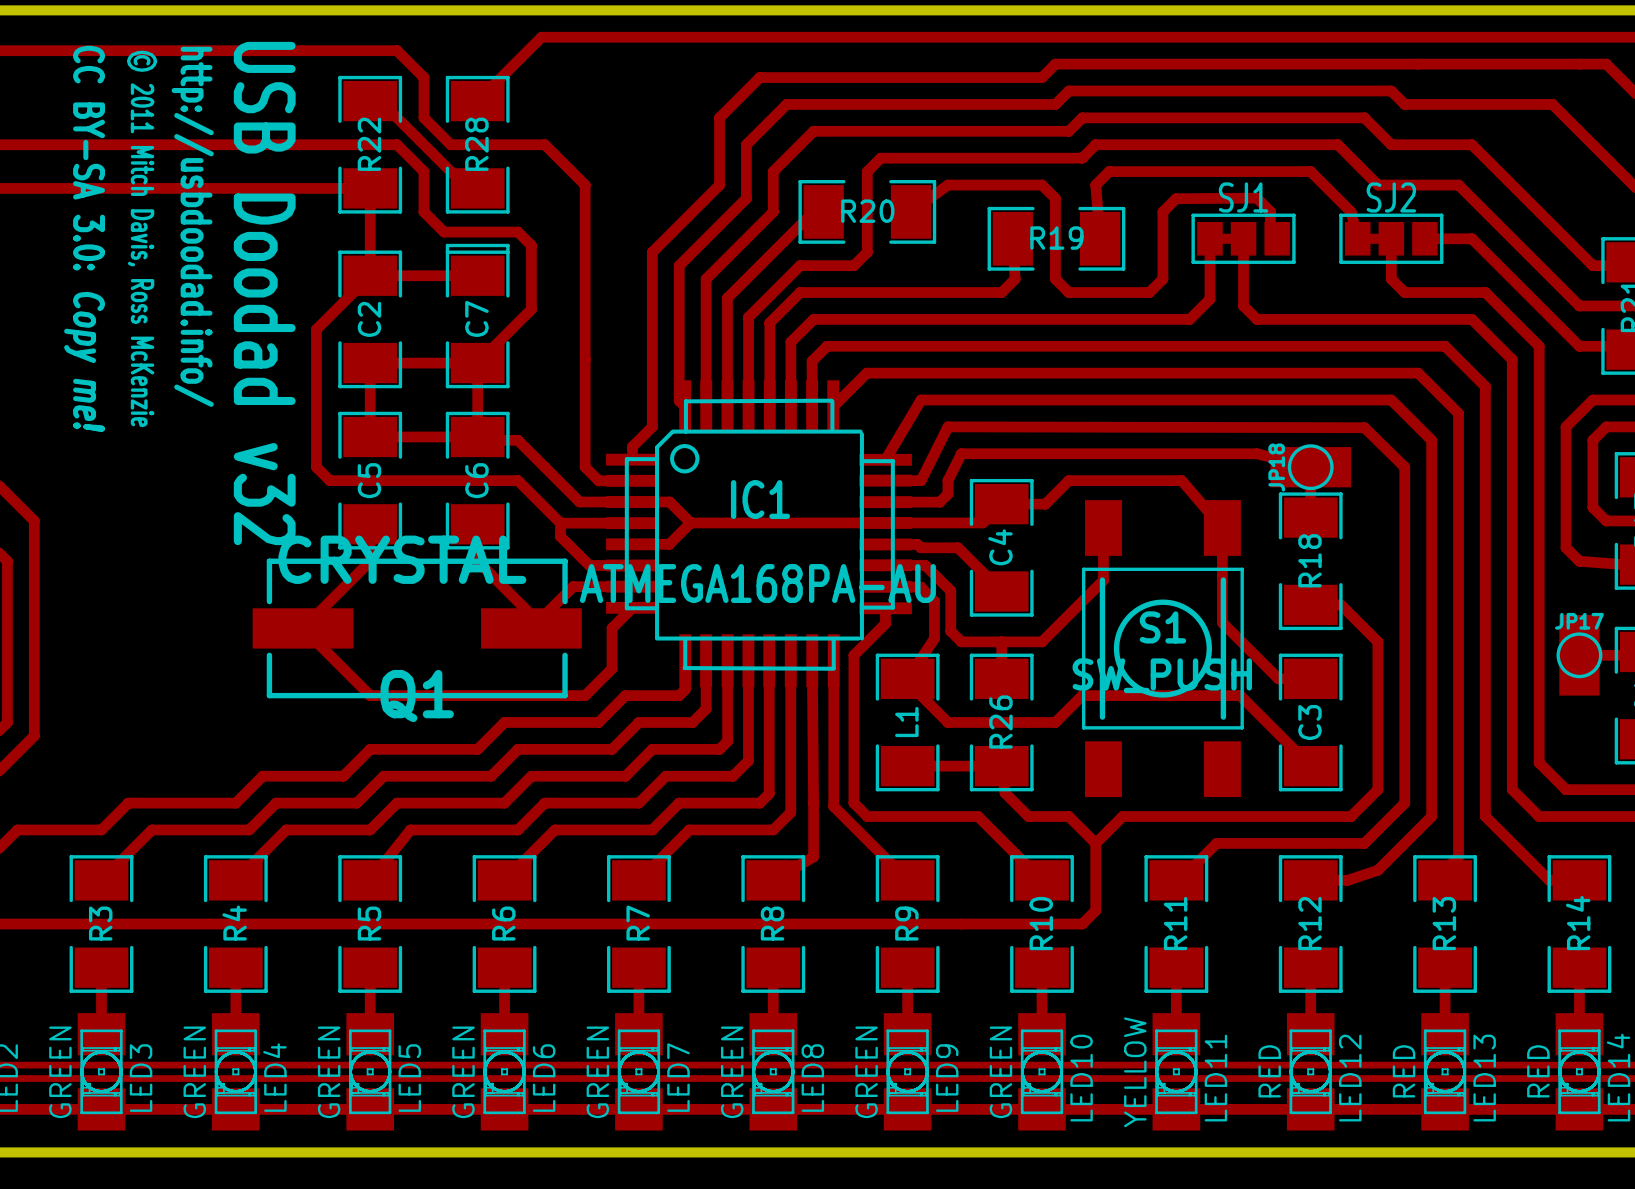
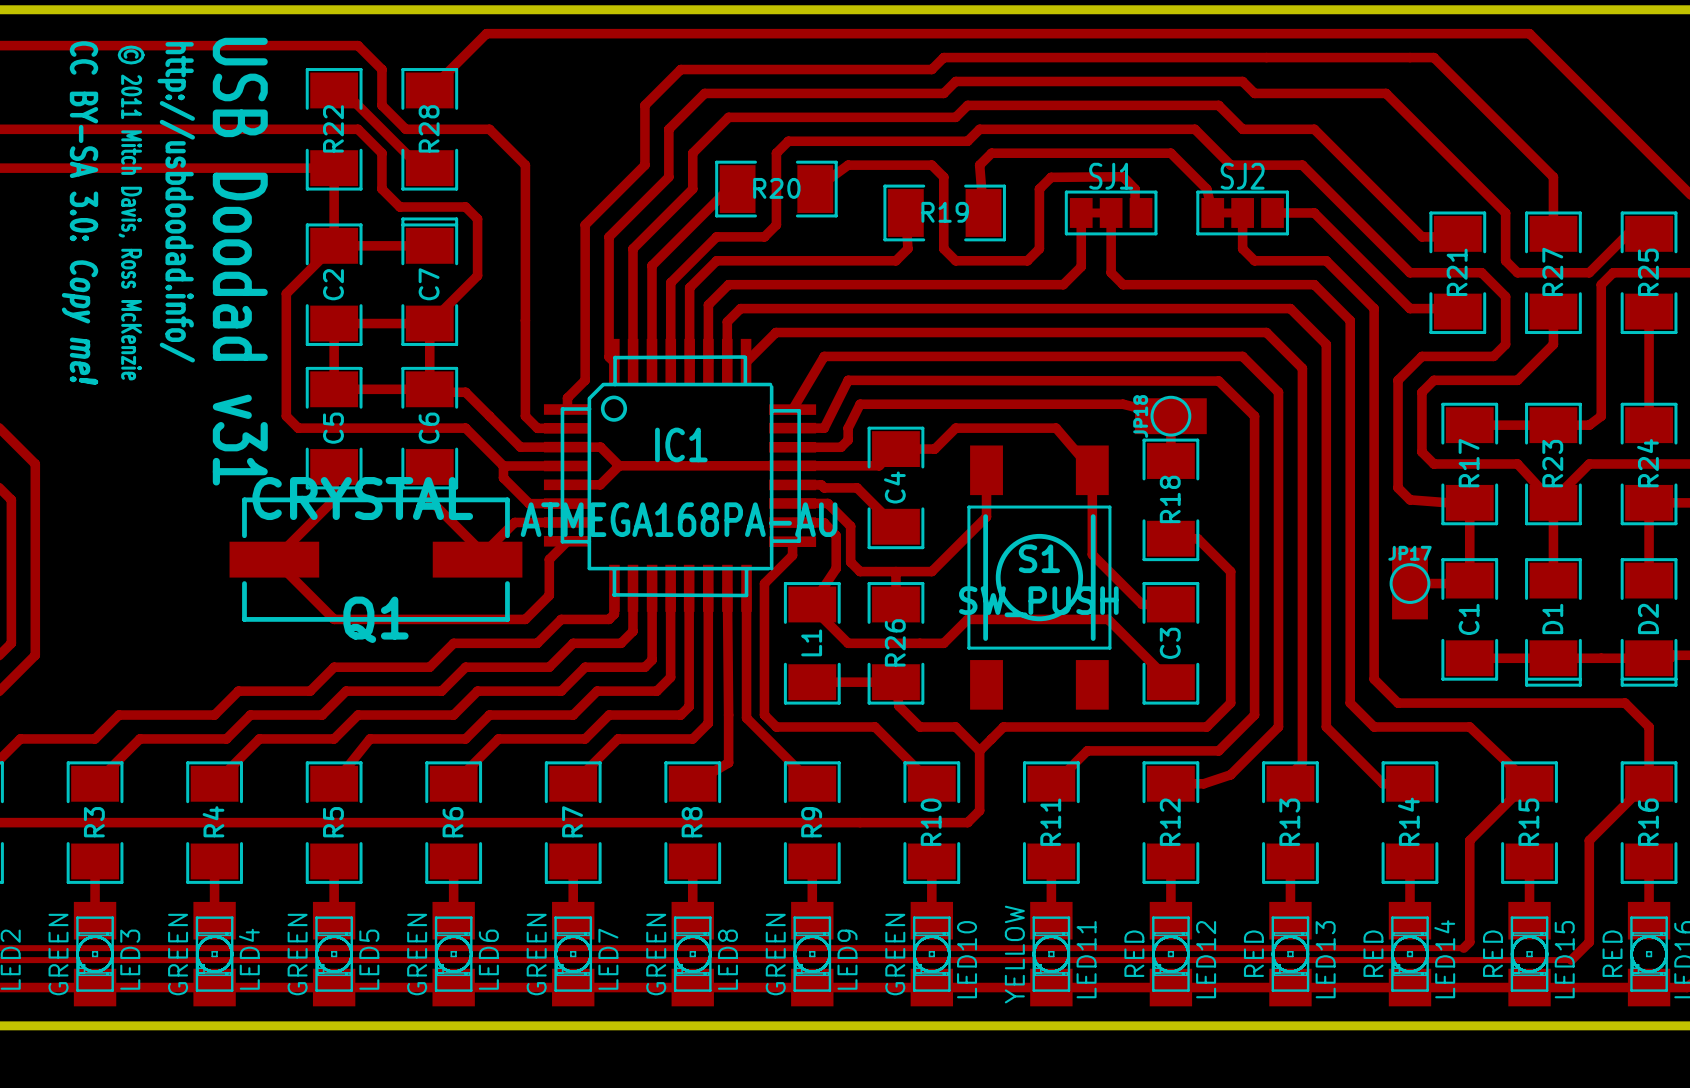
text: USB Doodad v32 (264, 293) -> USB Doodad v31 (240, 261)

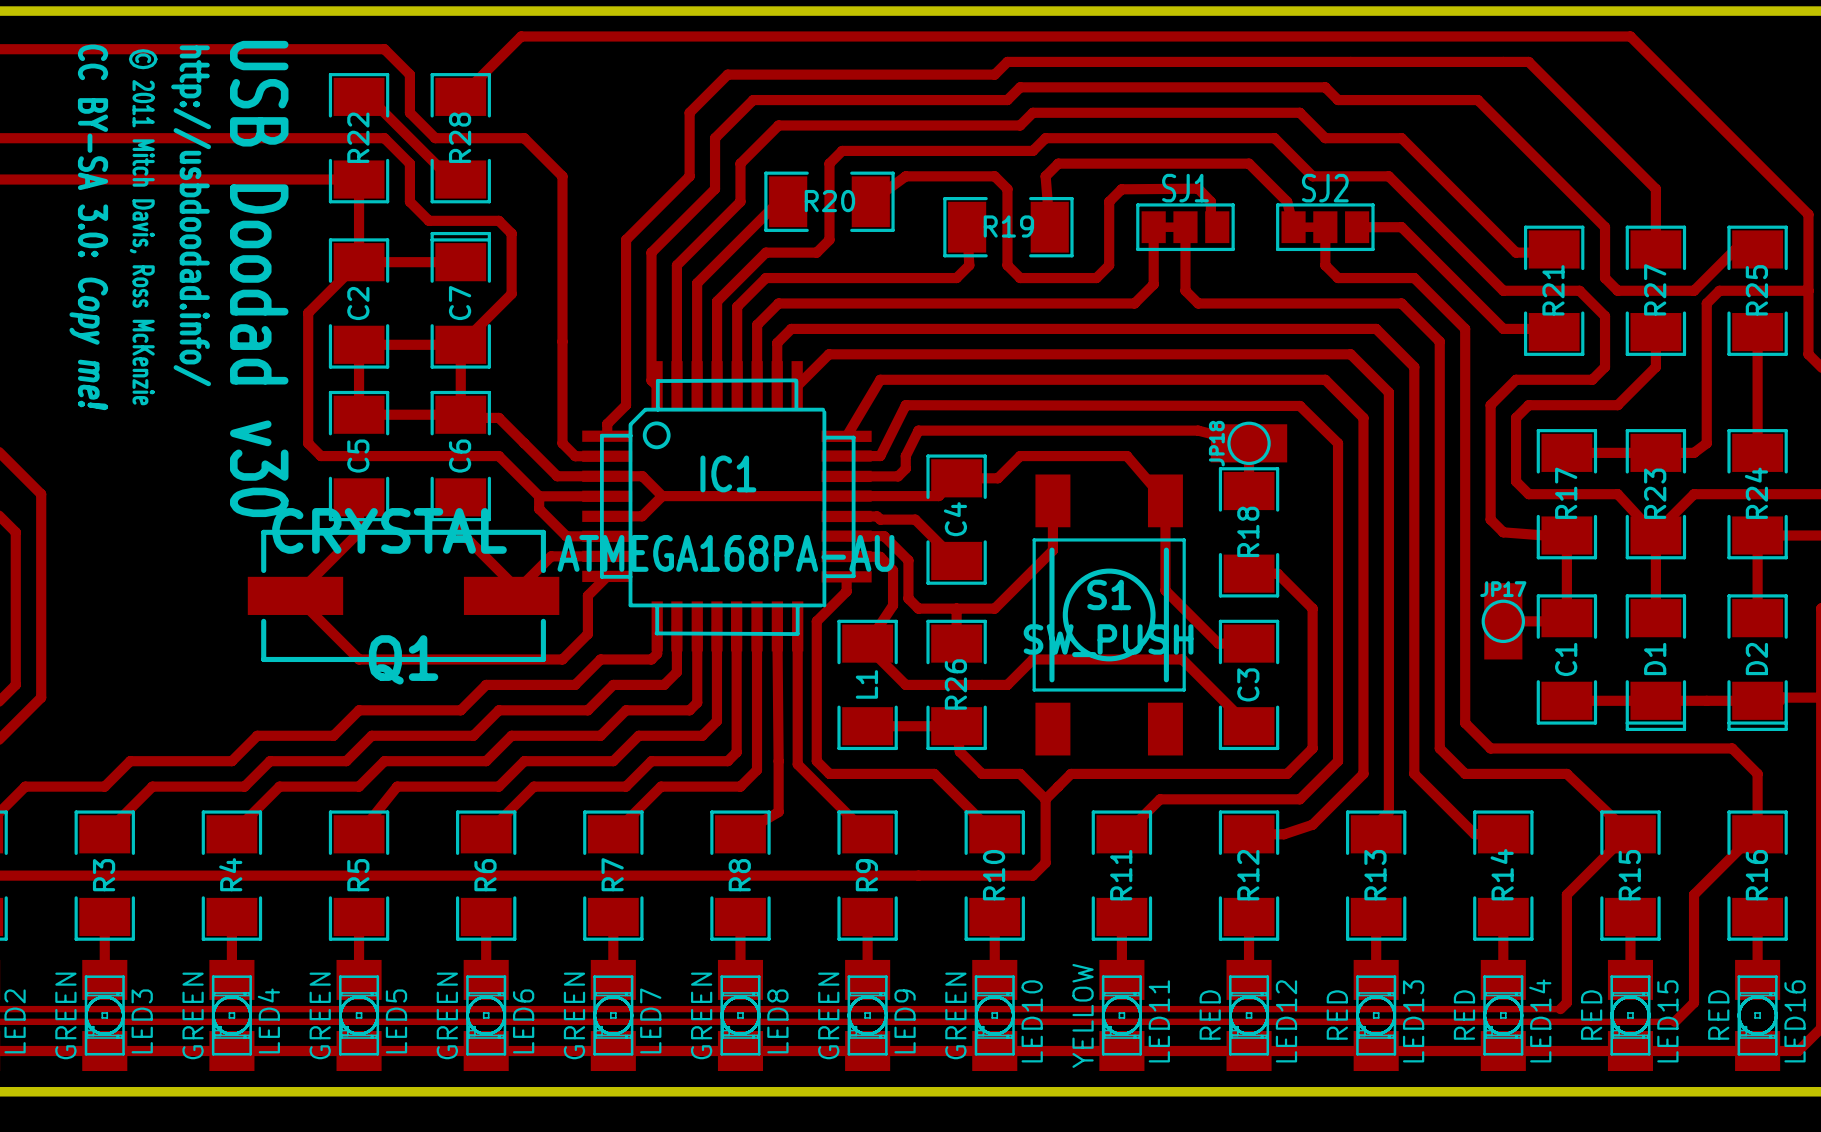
text: USB Doodad v31 (240, 261) -> USB Doodad v30 (259, 278)

